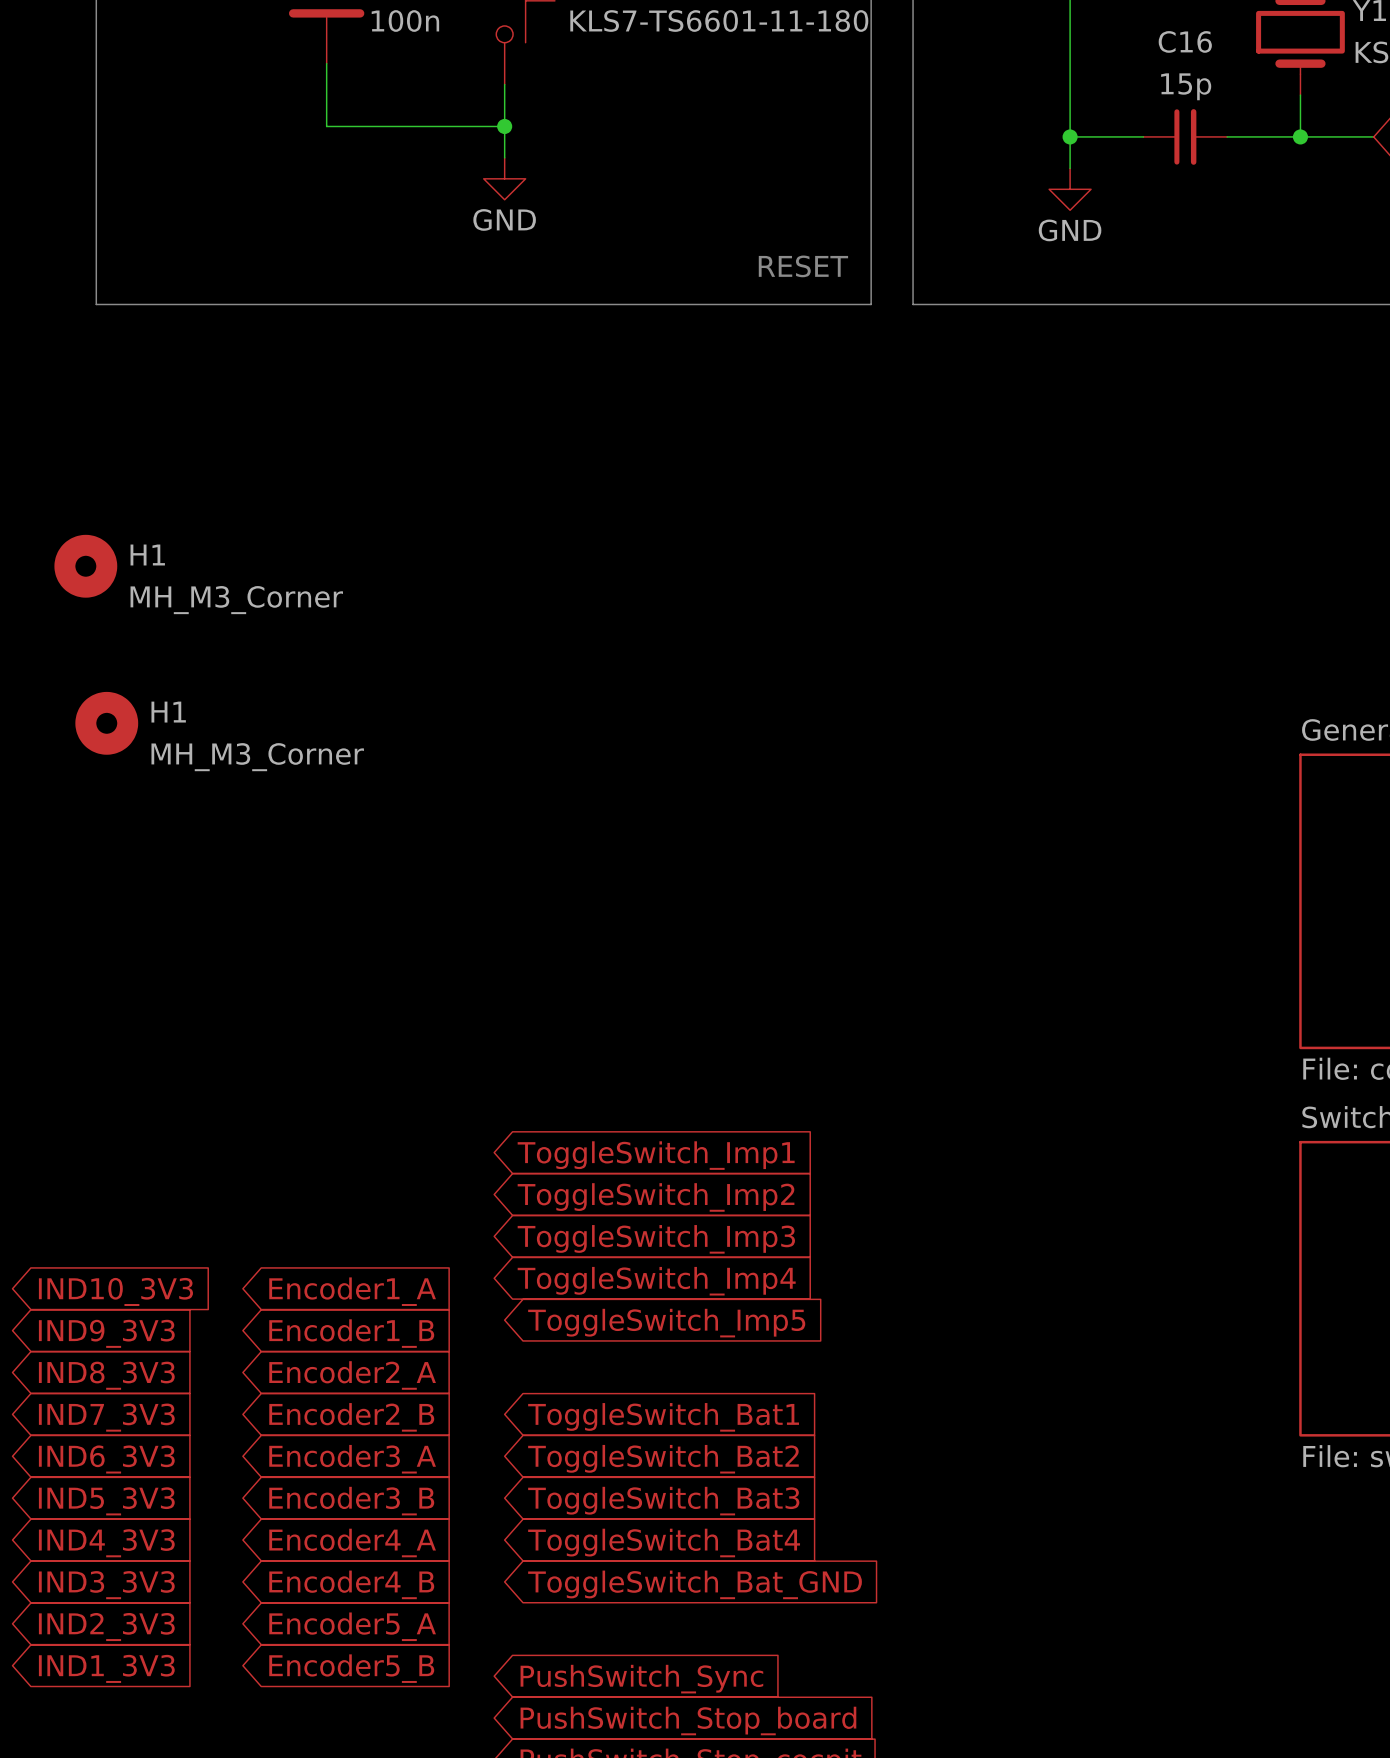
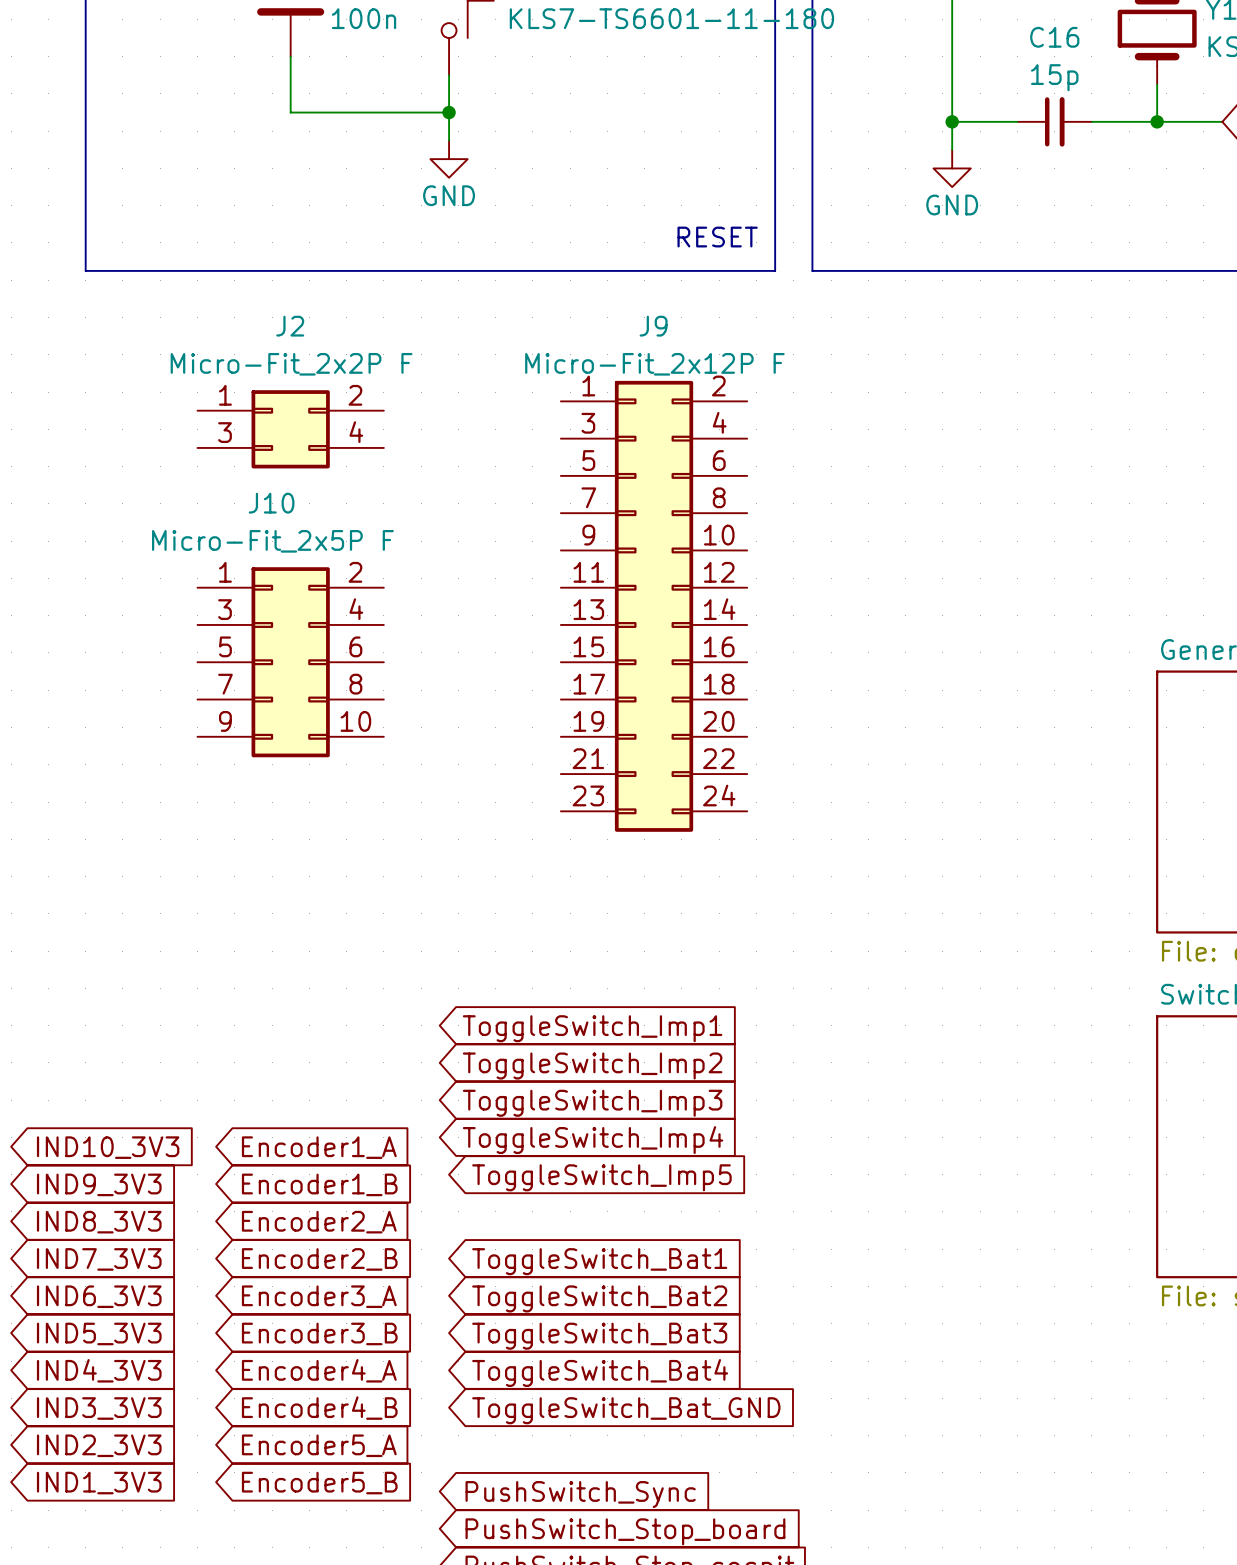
J2: none -> Micro-Fit_2x2P F (290, 429)
H1: MH_M3_Corner (85, 566) -> none
J9: none -> Micro-Fit_2x12P F (654, 606)
H1: MH_M3_Corner (106, 723) -> none
J10: none -> Micro-Fit_2x5P F (290, 662)

